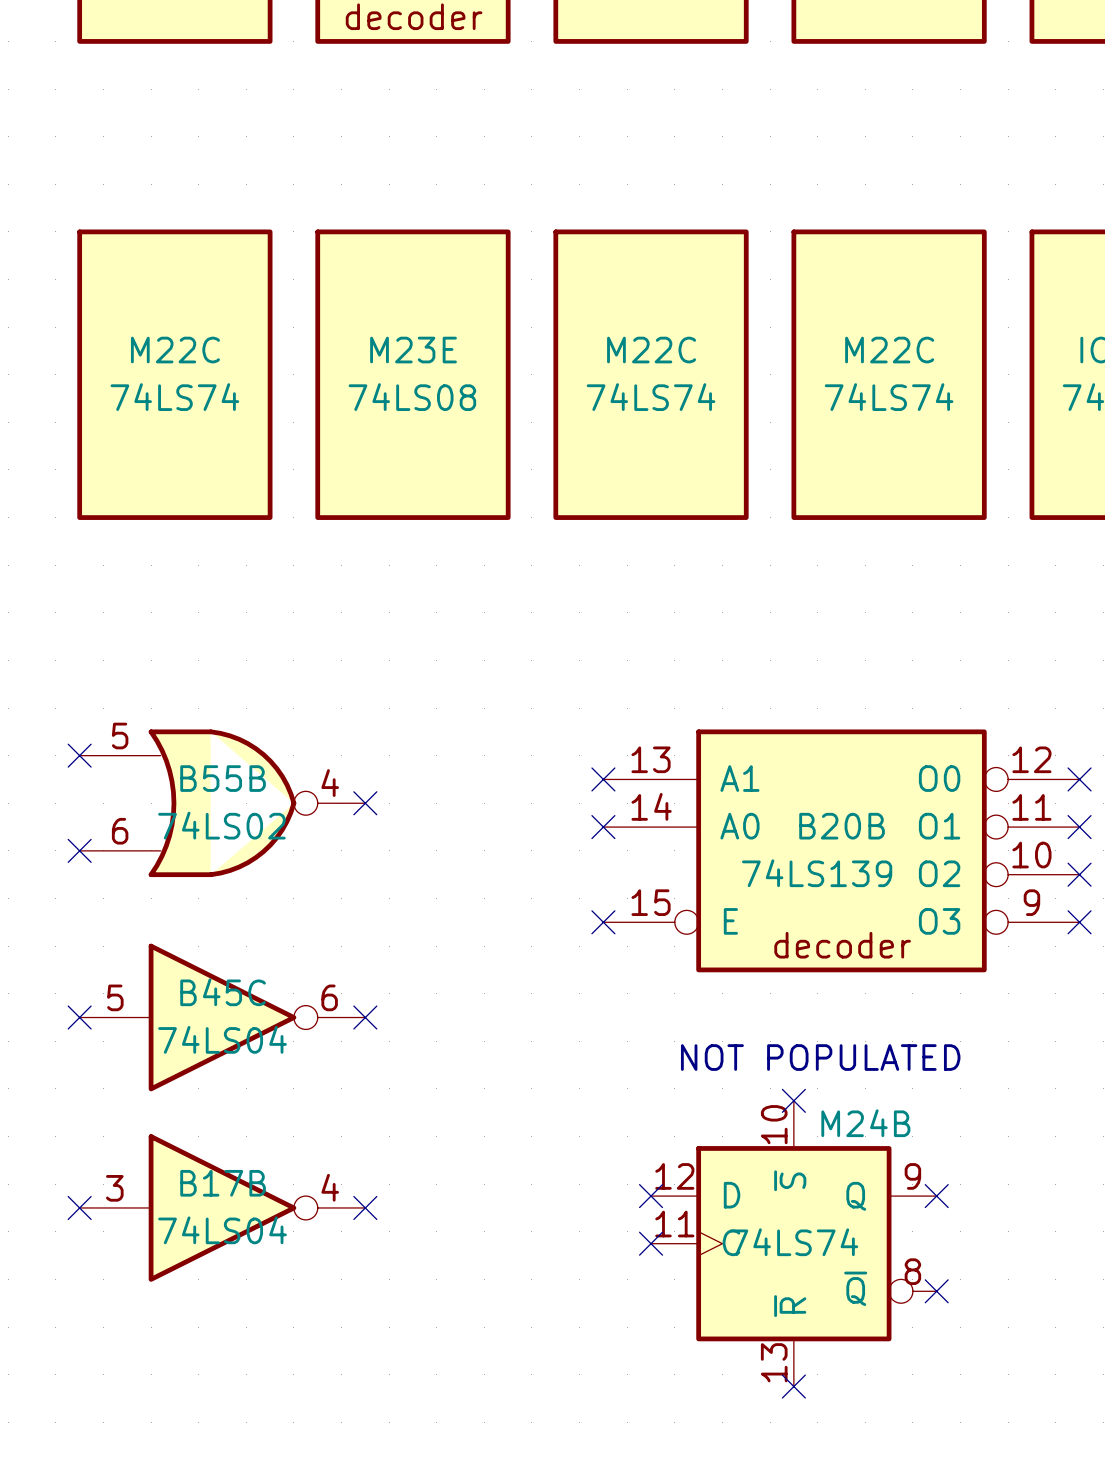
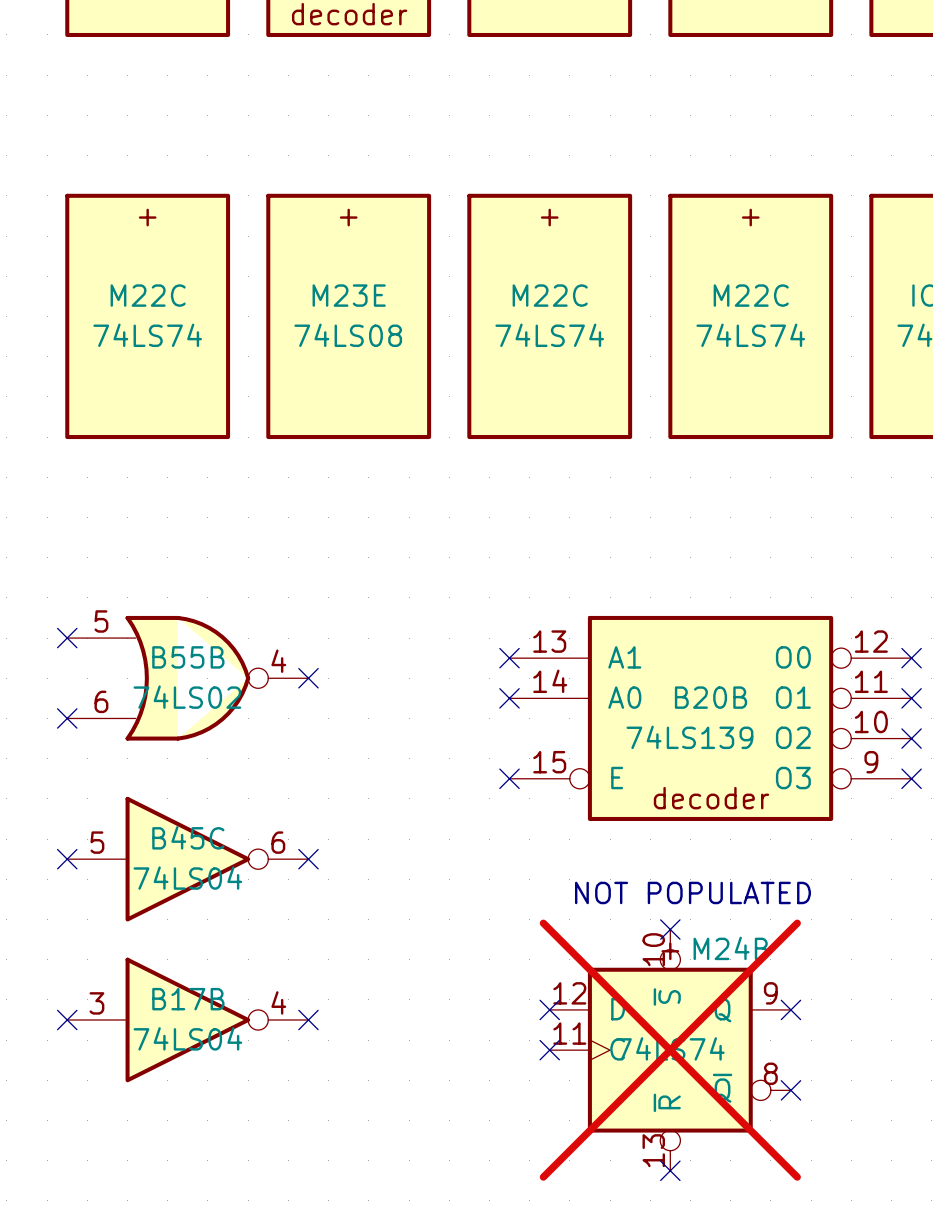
M22C text: none -> + (147, 217)
M23E text: none -> + (348, 217)
M22C text: none -> + (549, 217)
M22C text: none -> + (750, 217)
M24B symbol: [651, 1100, 937, 1387] -> [549, 929, 791, 1171]
M24B do-not-place cross: none -> (670, 1050)

